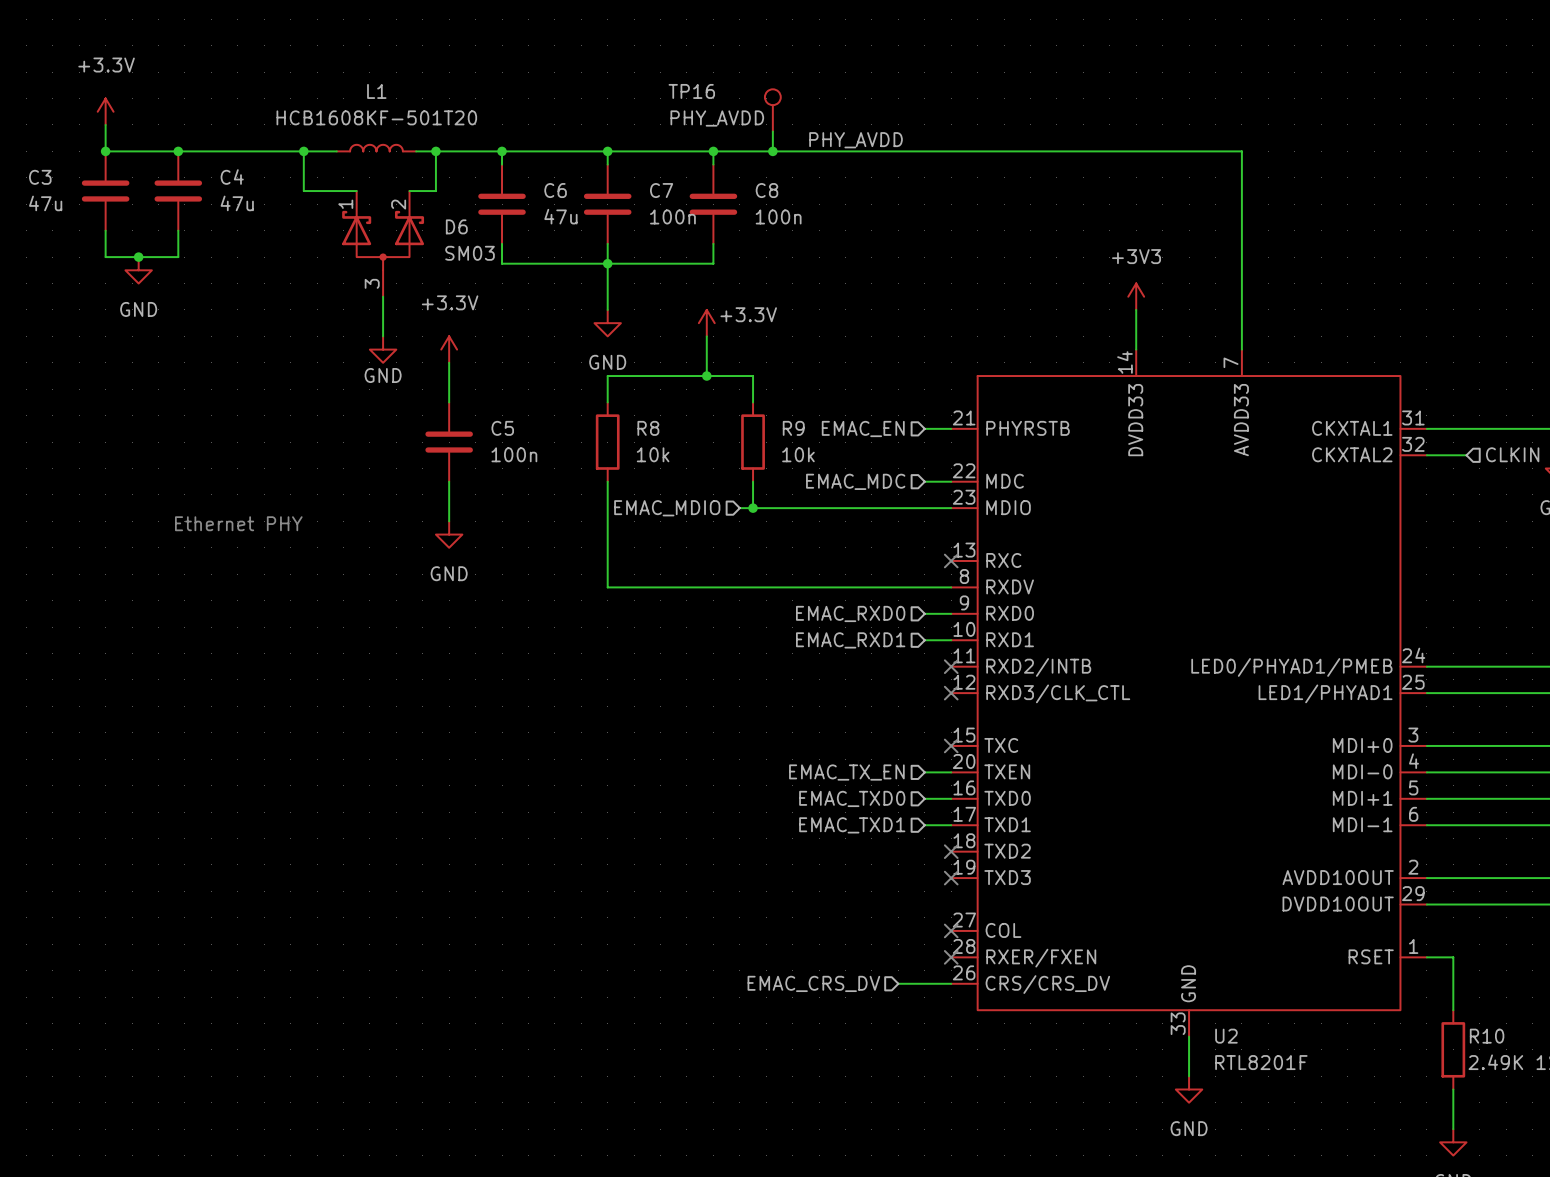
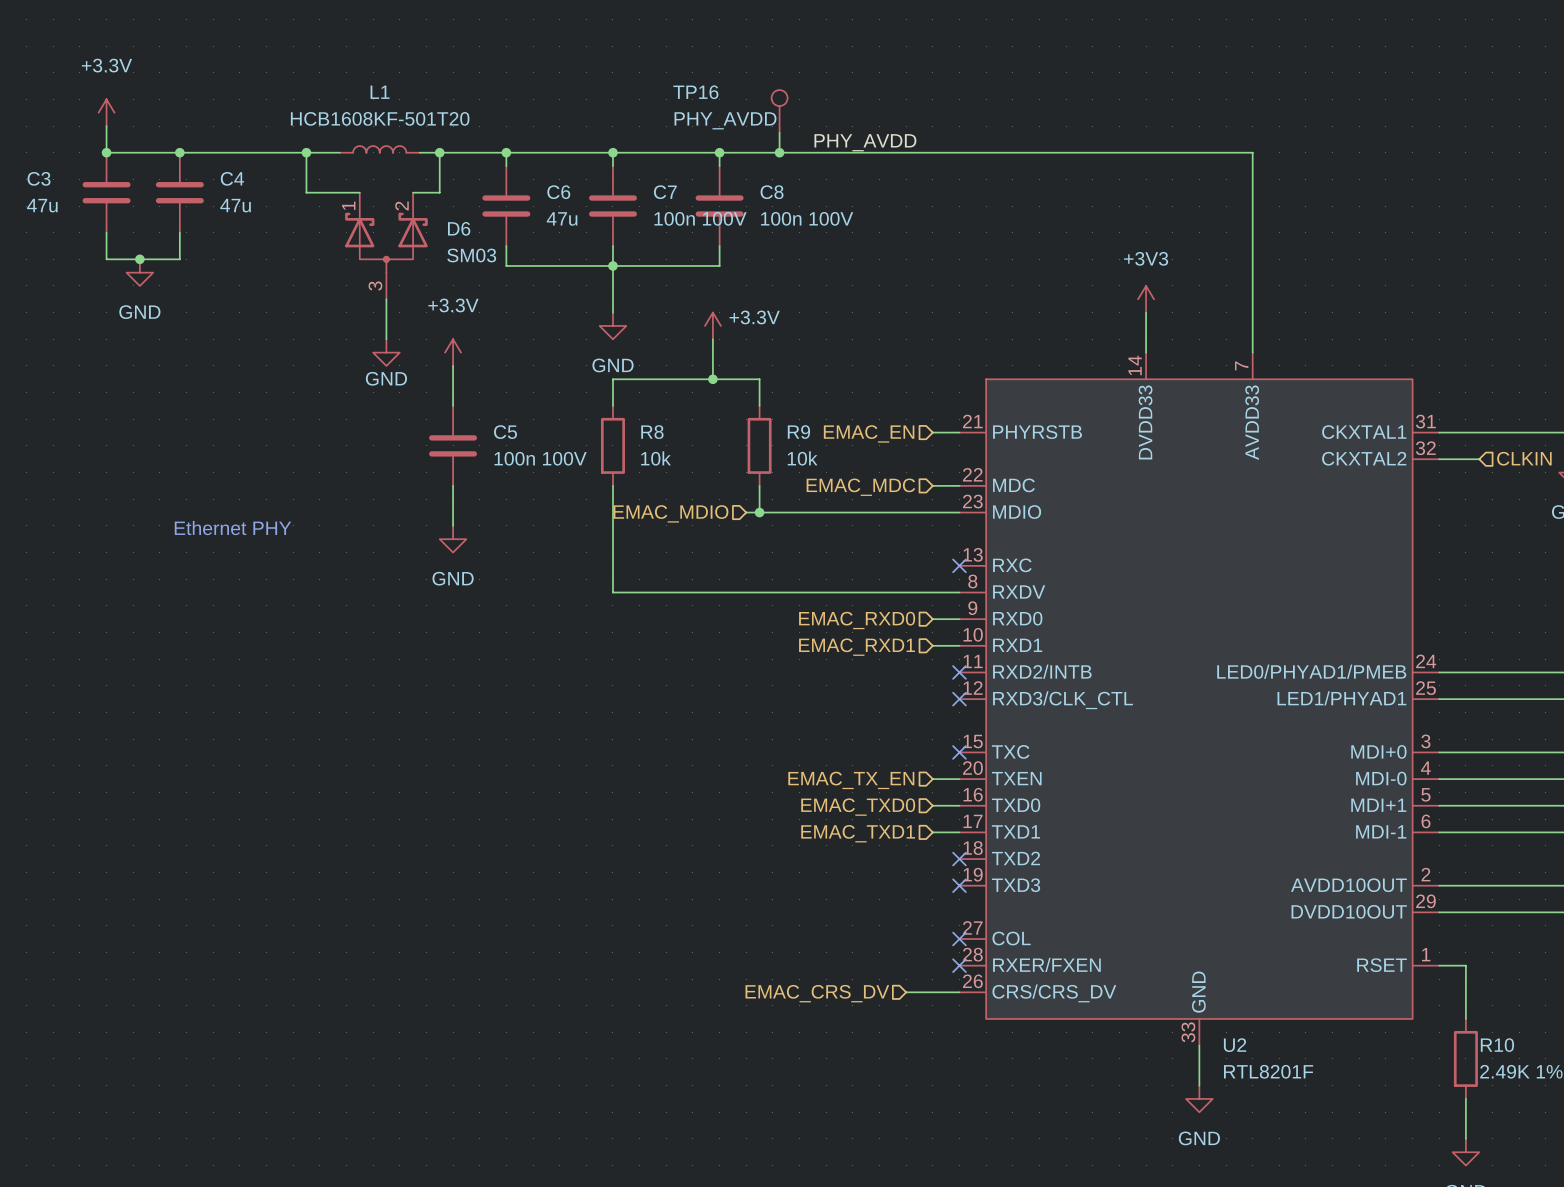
C7 value: 100n (672, 216) -> 100n 100V (700, 218)
C8 value: 100n (778, 216) -> 100n 100V (807, 218)
C5 value: 100n (514, 454) -> 100n 100V (540, 458)

